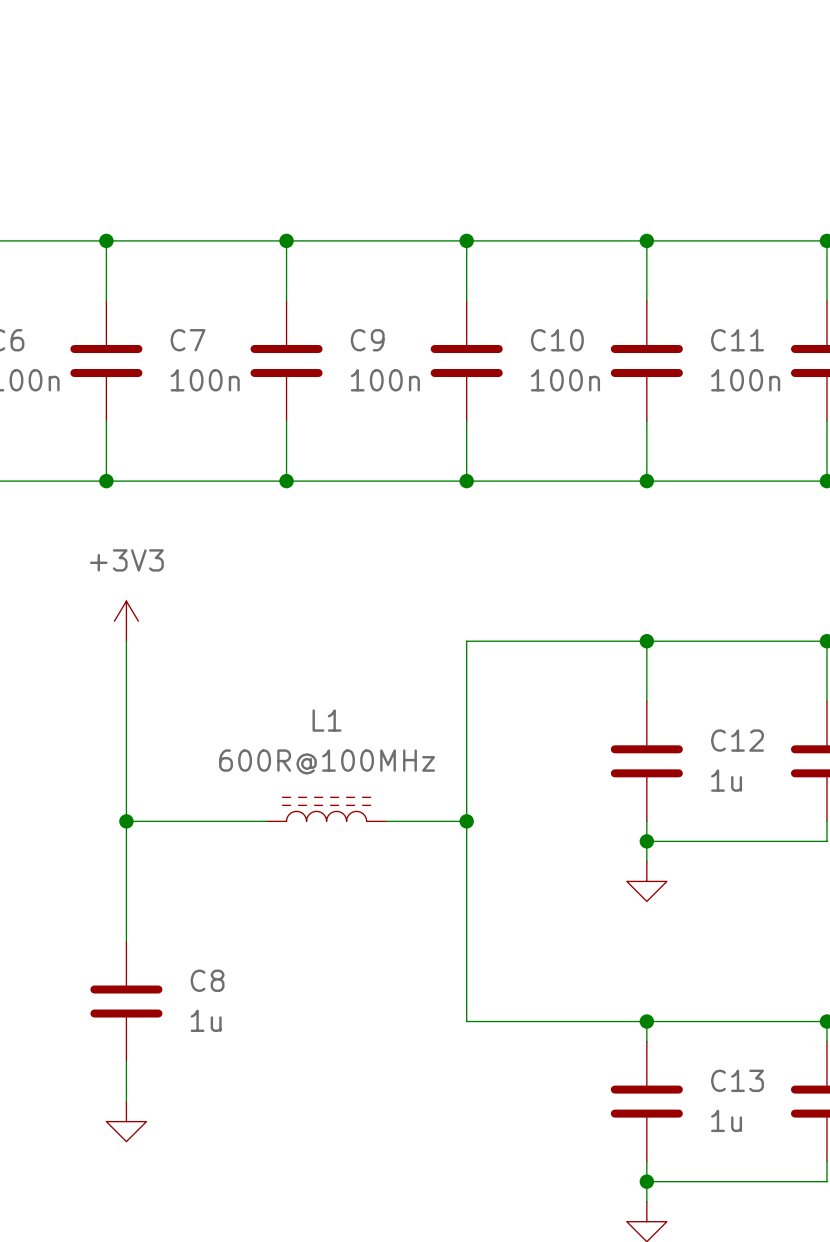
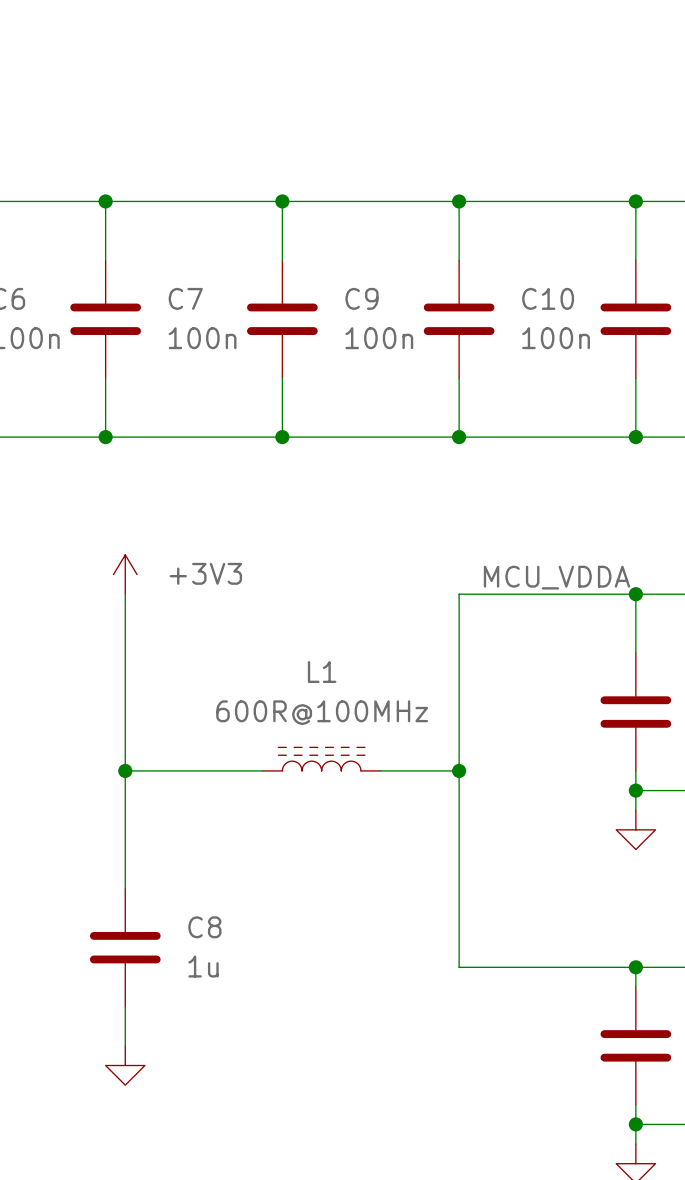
power symbol text position: +3V3 (126, 560) -> +3V3 (205, 573)
label: none -> MCU_VDDA (556, 577)

